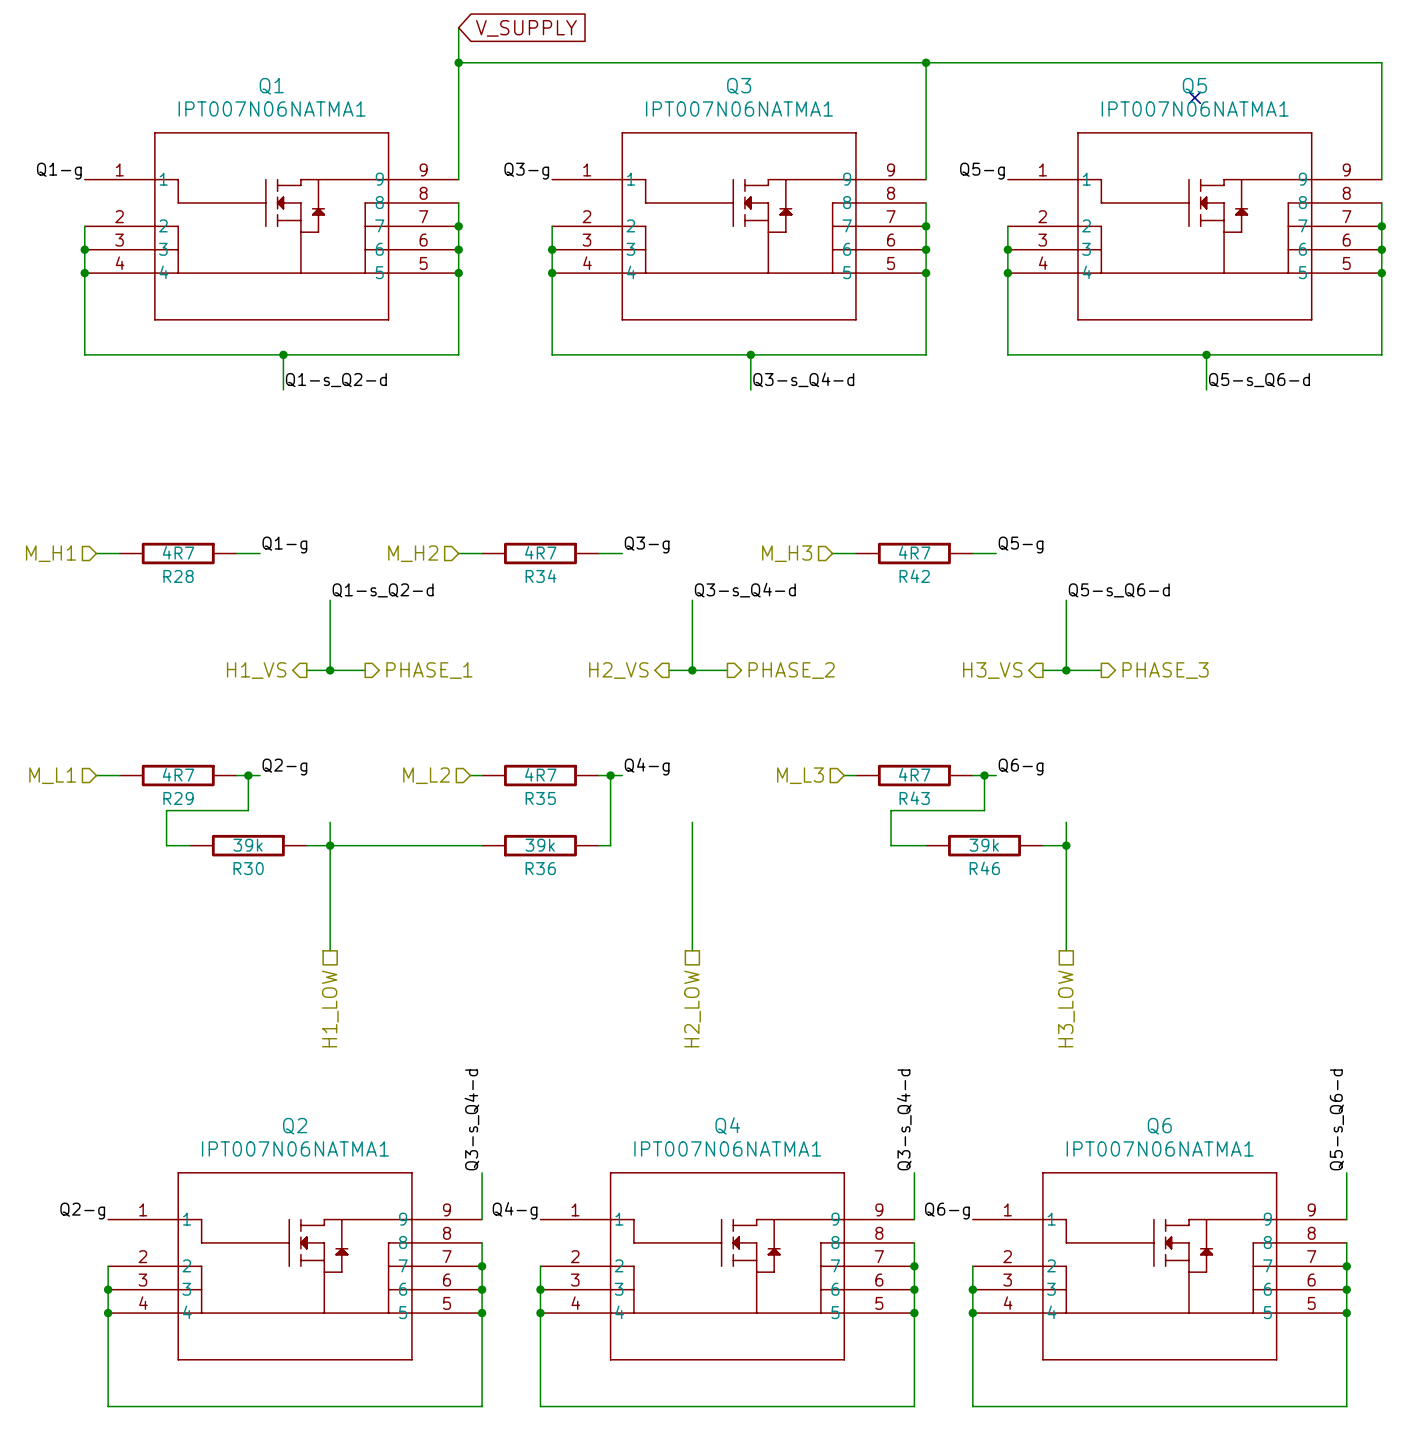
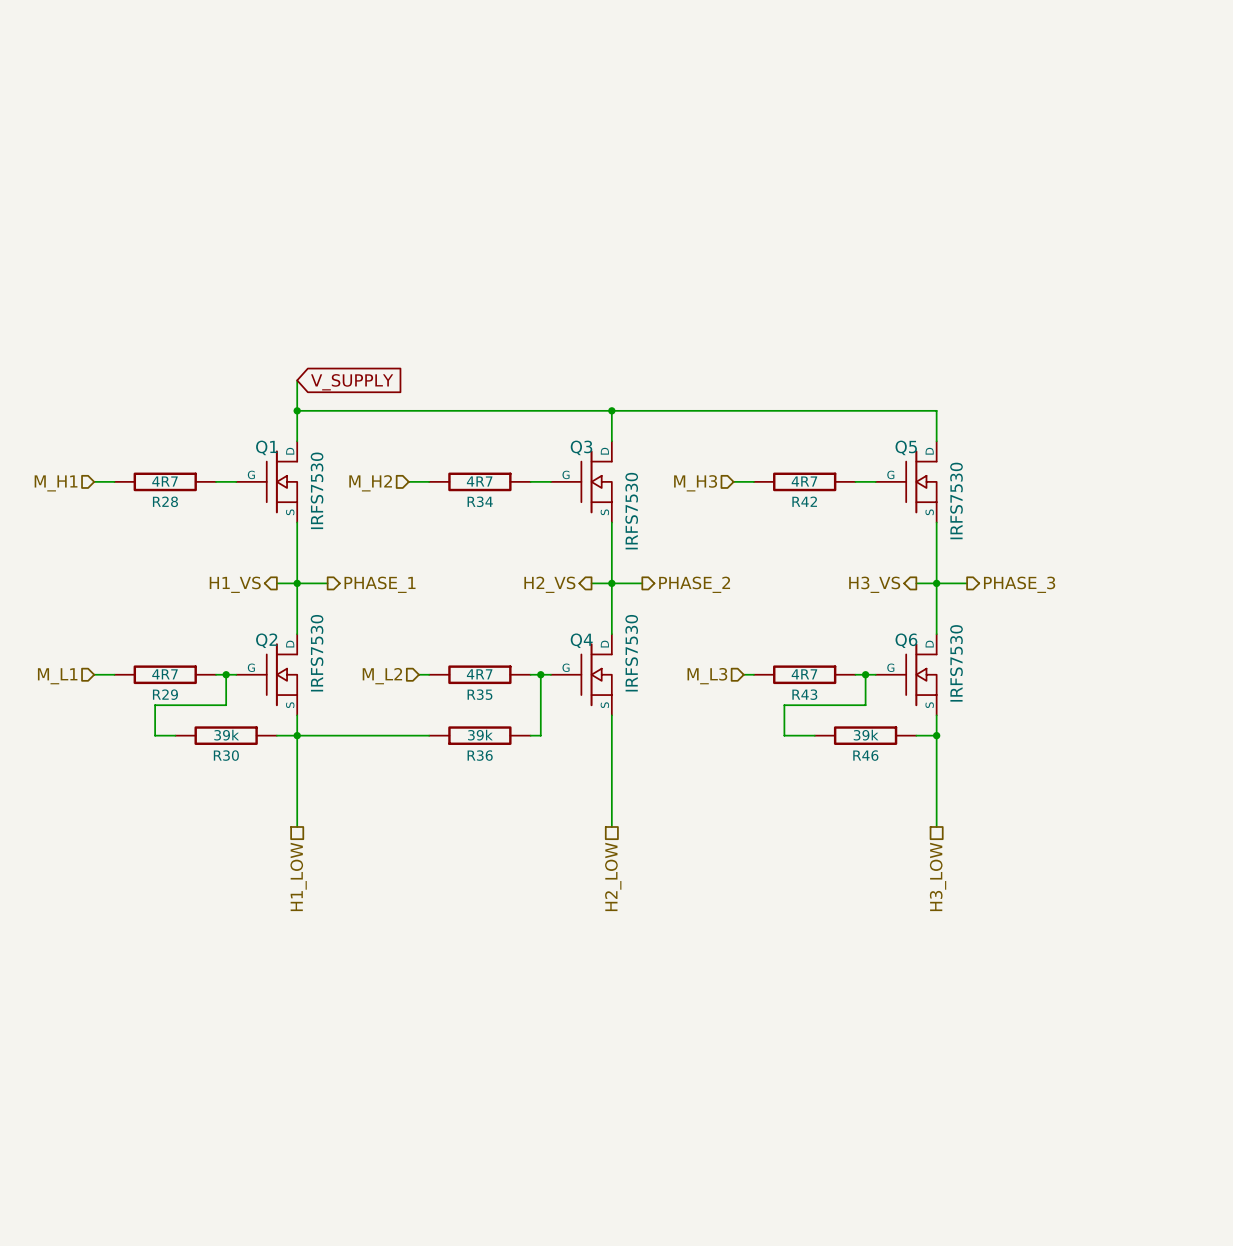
wire: (458, 27) (458, 179) -> none
global label: V_SUPPLY (526, 28) -> none
wire: (458, 62) (1381, 62) (1381, 179) -> none
junction: (458, 62) -> none
wire: (926, 62) (926, 179) -> none
junction: (926, 62) -> none
Q1 name position: Q1 (271, 86) -> Q1 (266, 447)
Q3 name position: Q3 (739, 86) -> Q3 (581, 447)
Q5 name position: Q5 (1194, 86) -> Q5 (906, 447)
no-connect mark: (1194, 97) -> none
Q1 value: IPT007N06NATMA1 (272, 108) -> IRFS7530 (317, 490)
Q3 value: IPT007N06NATMA1 (739, 108) -> IRFS7530 (631, 511)
Q5 value: IPT007N06NATMA1 (1195, 108) -> IRFS7530 (956, 500)
Q1 symbol: [84, 132, 459, 321] -> [236, 441, 299, 523]
Q3 symbol: [552, 132, 927, 321] -> [550, 441, 613, 523]
Q5 symbol: [1007, 132, 1382, 321] -> [875, 441, 938, 523]
label: Q1-g (59, 171) -> none
label: Q3-g (526, 171) -> none
label: Q5-g (982, 171) -> none
wire: (458, 202) (458, 354) (84, 354) (84, 226) -> none
wire: (926, 202) (926, 354) (552, 354) (552, 226) -> none
wire: (1381, 202) (1381, 354) (1007, 354) (1007, 226) -> none
junction: (458, 226) -> none
junction: (926, 226) -> none
junction: (1381, 226) -> none
junction: (84, 249) -> none
junction: (458, 249) -> none
junction: (552, 249) -> none
junction: (926, 249) -> none
junction: (1007, 249) -> none
junction: (1381, 249) -> none
junction: (84, 273) -> none
junction: (458, 273) -> none
junction: (552, 273) -> none
junction: (926, 273) -> none
junction: (1007, 273) -> none
junction: (1381, 273) -> none
wire: (283, 354) (283, 389) -> none
junction: (283, 354) -> none
wire: (750, 354) (750, 389) -> (611, 410) (611, 441)
junction: (750, 354) -> none
wire: (1206, 354) (1206, 389) -> none
junction: (1206, 354) -> none
label: Q3-s_Q4-d (803, 379) -> none
label: Q1-s_Q2-d (336, 380) -> none
label: Q5-s_Q6-d (1259, 380) -> none
wire: none -> (297, 380) (297, 441)
global label: none -> V_SUPPLY (352, 382)
wire: none -> (297, 410) (936, 410) (936, 441)
junction: none -> (297, 410)
junction: none -> (611, 410)
label: Q1-g (284, 545) -> none
label: Q3-g (647, 545) -> none
label: Q5-g (1021, 545) -> none
label: Q1-s_Q2-d (383, 590) -> none
label: Q3-s_Q4-d (745, 590) -> none
label: Q5-s_Q6-d (1119, 590) -> none
wire: none -> (297, 583) (297, 634)
wire: none -> (611, 583) (611, 634)
wire: none -> (936, 583) (936, 634)
label: Q4-g (647, 766) -> none
label: Q2-g (284, 767) -> none
label: Q6-g (1021, 767) -> none
label: Q3-s_Q4-d (471, 1119) -> none
label: Q3-s_Q4-d (904, 1119) -> none
label: Q5-s_Q6-d (1336, 1119) -> none
Q4 name position: Q4 (727, 1125) -> Q4 (581, 640)
Q2 name position: Q2 (295, 1126) -> Q2 (266, 640)
Q6 name position: Q6 (1159, 1126) -> Q6 (906, 640)
Q2 value: IPT007N06NATMA1 (295, 1148) -> IRFS7530 (317, 653)
Q4 value: IPT007N06NATMA1 (727, 1148) -> IRFS7530 (631, 653)
Q6 value: IPT007N06NATMA1 (1160, 1148) -> IRFS7530 (956, 663)
Q2 symbol: [108, 1172, 483, 1361] -> [236, 634, 299, 716]
wire: (482, 1172) (482, 1219) -> none
Q4 symbol: [540, 1172, 915, 1361] -> [550, 634, 613, 716]
wire: (914, 1172) (914, 1219) -> none
Q6 symbol: [972, 1172, 1347, 1361] -> [875, 634, 938, 716]
wire: (1346, 1172) (1346, 1219) -> none
label: Q4-g (515, 1210) -> none
label: Q2-g (82, 1211) -> none
label: Q6-g (947, 1211) -> none
wire: (482, 1242) (482, 1406) (108, 1406) (108, 1266) -> none
wire: (914, 1242) (914, 1406) (540, 1406) (540, 1266) -> none
wire: (1346, 1242) (1346, 1406) (972, 1406) (972, 1266) -> none
junction: (482, 1266) -> none
junction: (914, 1266) -> none
junction: (1346, 1266) -> none
junction: (108, 1289) -> none
junction: (482, 1289) -> none
junction: (540, 1289) -> none
junction: (914, 1289) -> none
junction: (972, 1289) -> none
junction: (1346, 1289) -> none
junction: (108, 1313) -> none
junction: (482, 1313) -> none
junction: (540, 1313) -> none
junction: (914, 1313) -> none
junction: (972, 1313) -> none
junction: (1346, 1313) -> none

